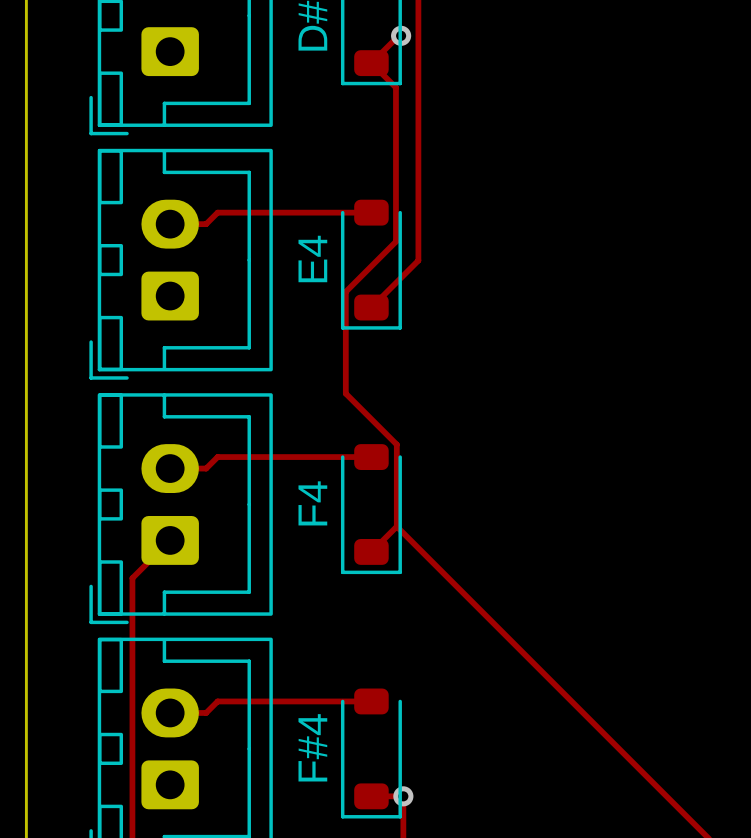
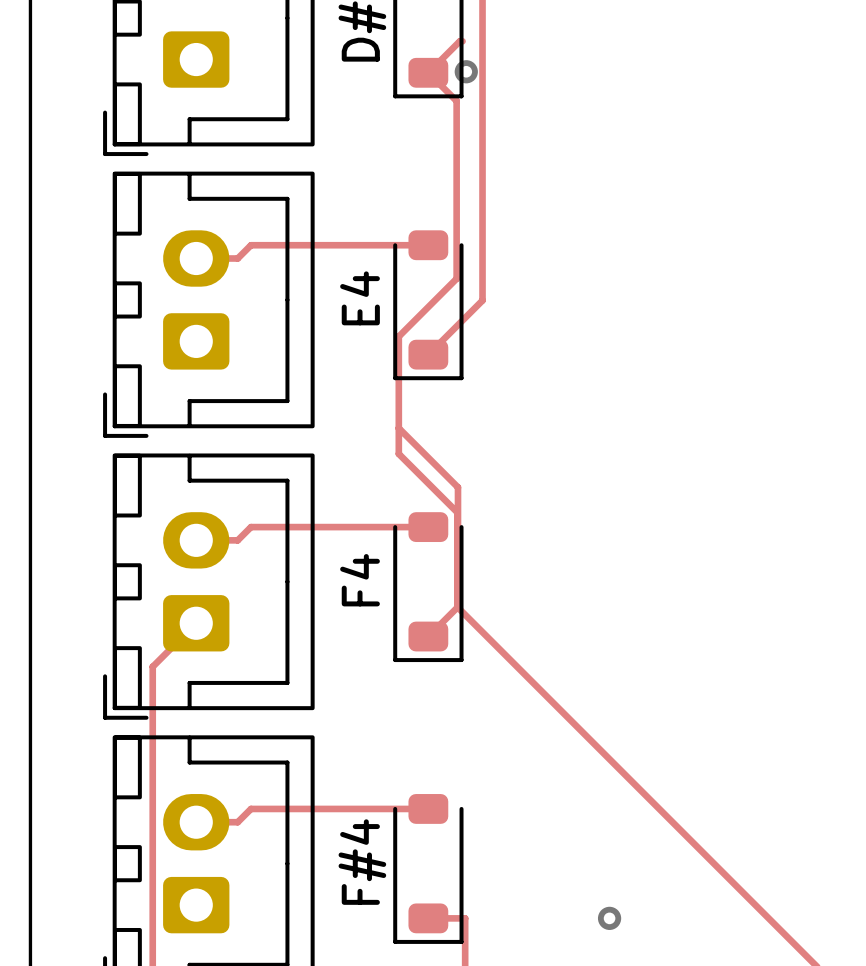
via position: (401, 35) -> (466, 71)
track: none -> (398, 428) (458, 487) (458, 606)
via position: (403, 796) -> (609, 918)

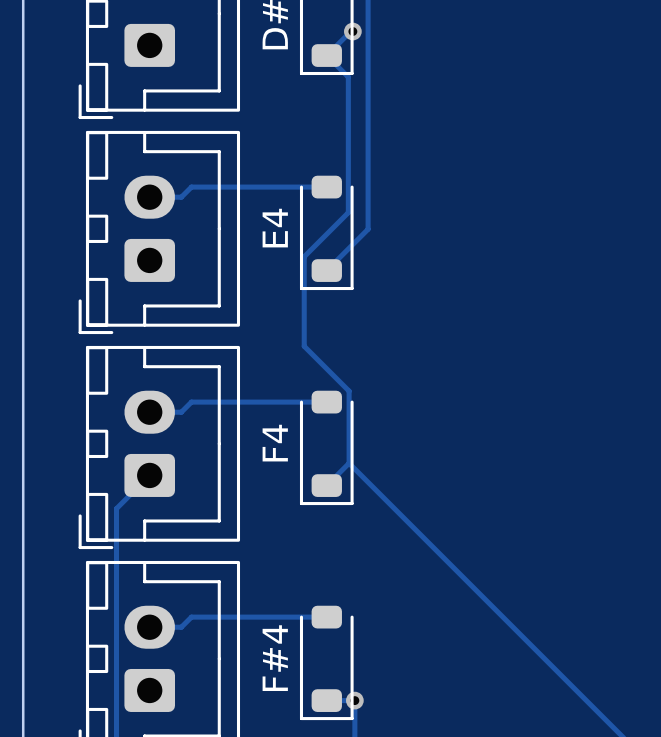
via position: (466, 71) -> (352, 31)
track: (398, 428) (458, 487) (458, 606) -> none
via position: (609, 918) -> (354, 700)

